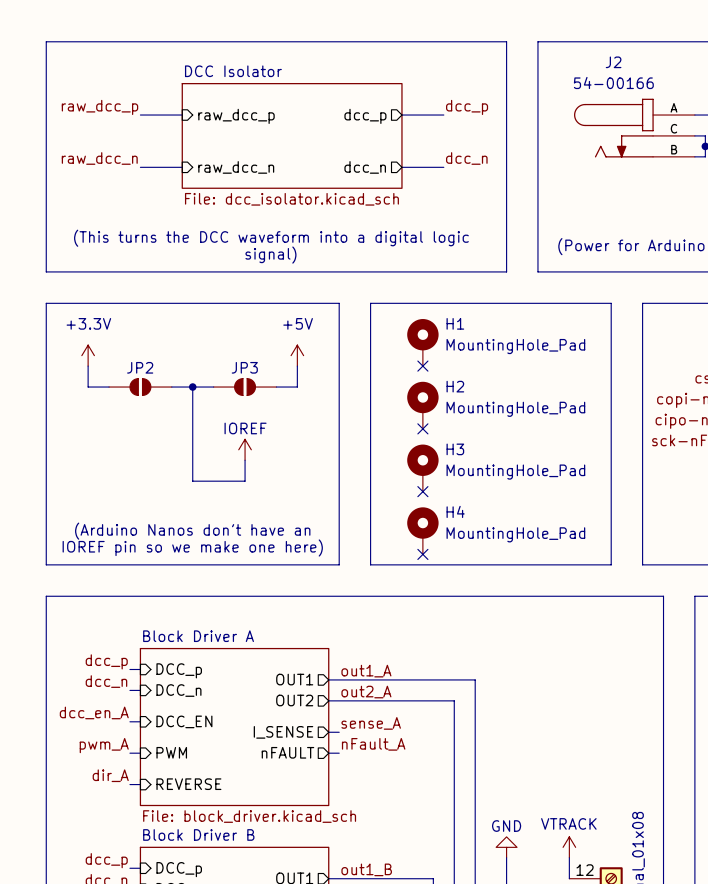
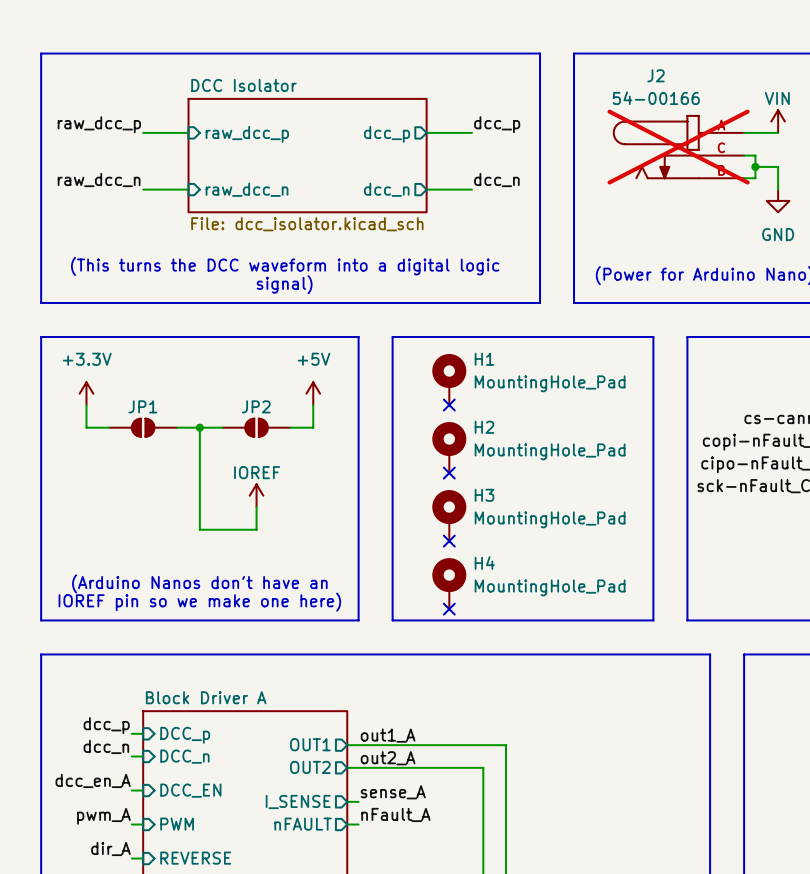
J2 do-not-place cross: none -> (678, 147)
JP2 name: JP2 (140, 367) -> JP1 (142, 406)
JP3 name: JP3 (244, 367) -> JP2 (256, 406)

